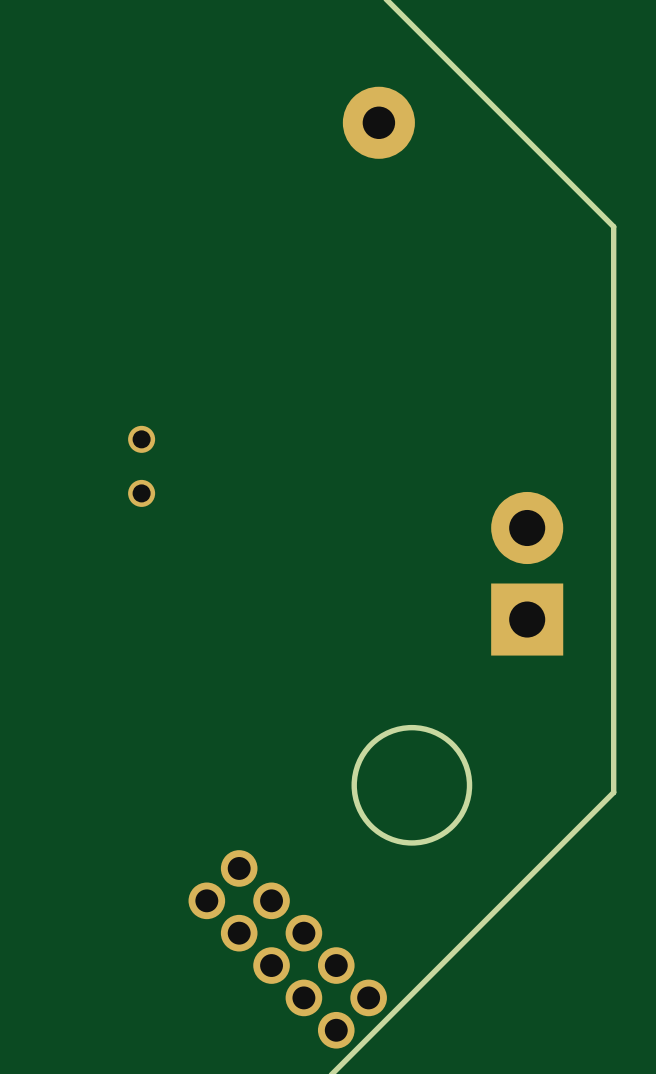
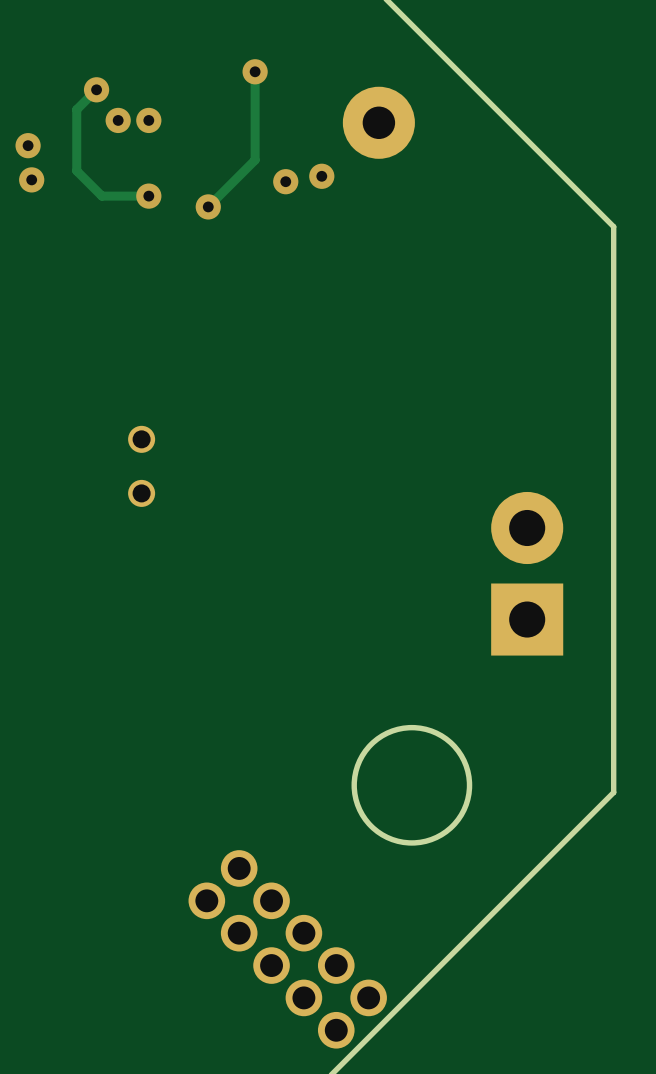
track: none -> (255, 71) (255, 160) (208, 206)
via: none -> (255, 71)
track: none -> (96, 89) (76, 109) (76, 170) (101, 196) (148, 196)
via: none -> (96, 89)
via: none -> (118, 120)
via: none -> (148, 120)
via: none -> (28, 145)
via: none -> (321, 176)
via: none -> (31, 179)
via: none -> (285, 181)
via: none -> (148, 196)
via: none -> (208, 206)

